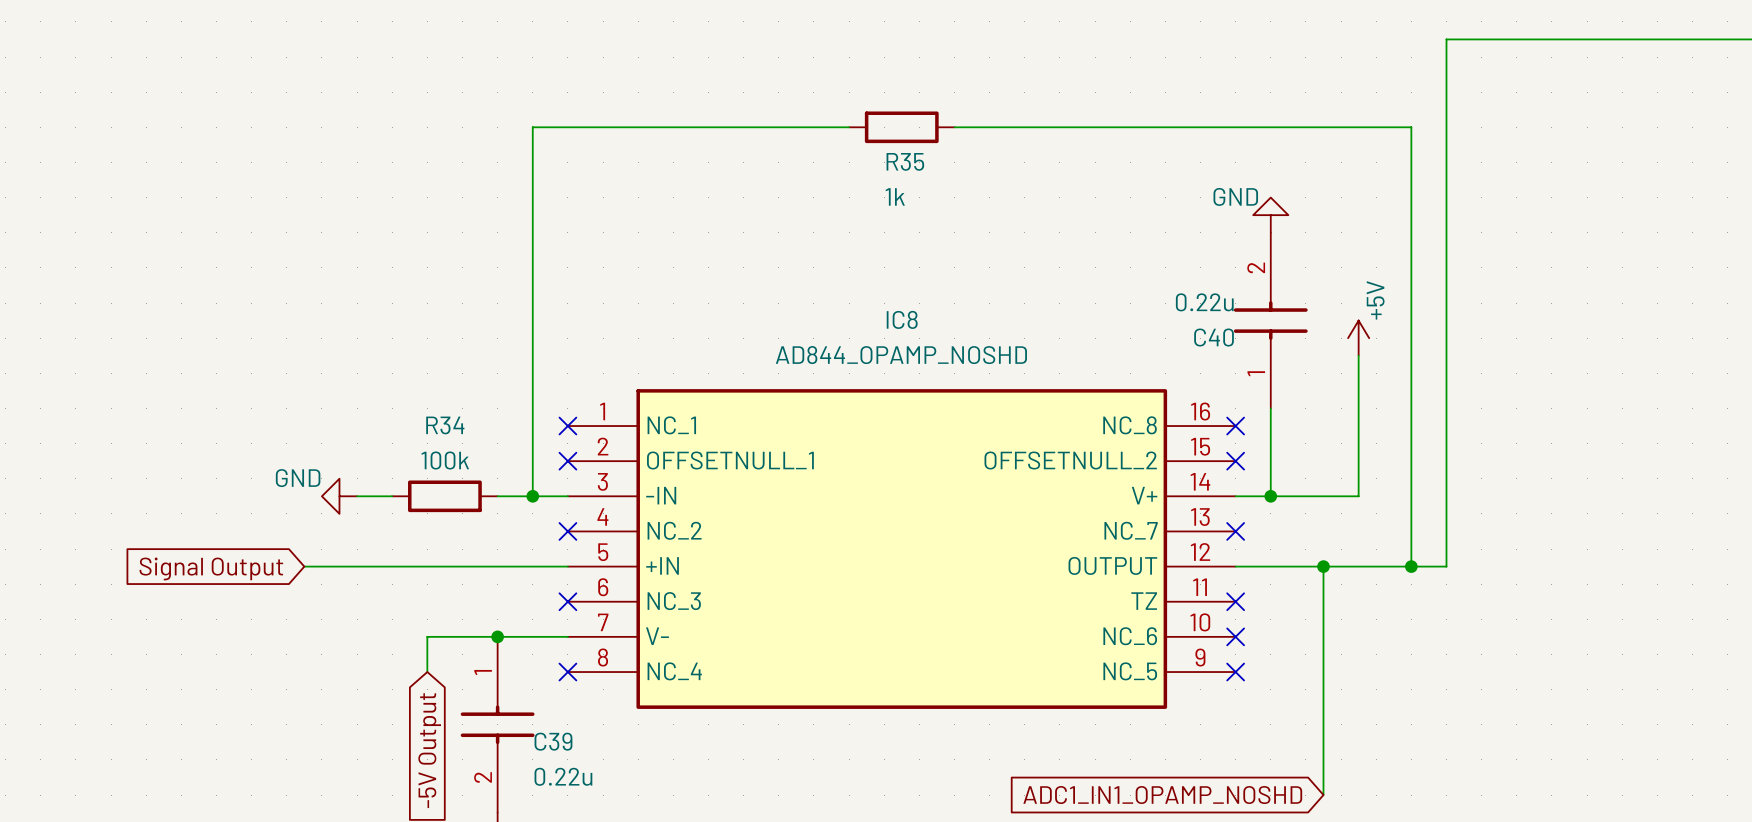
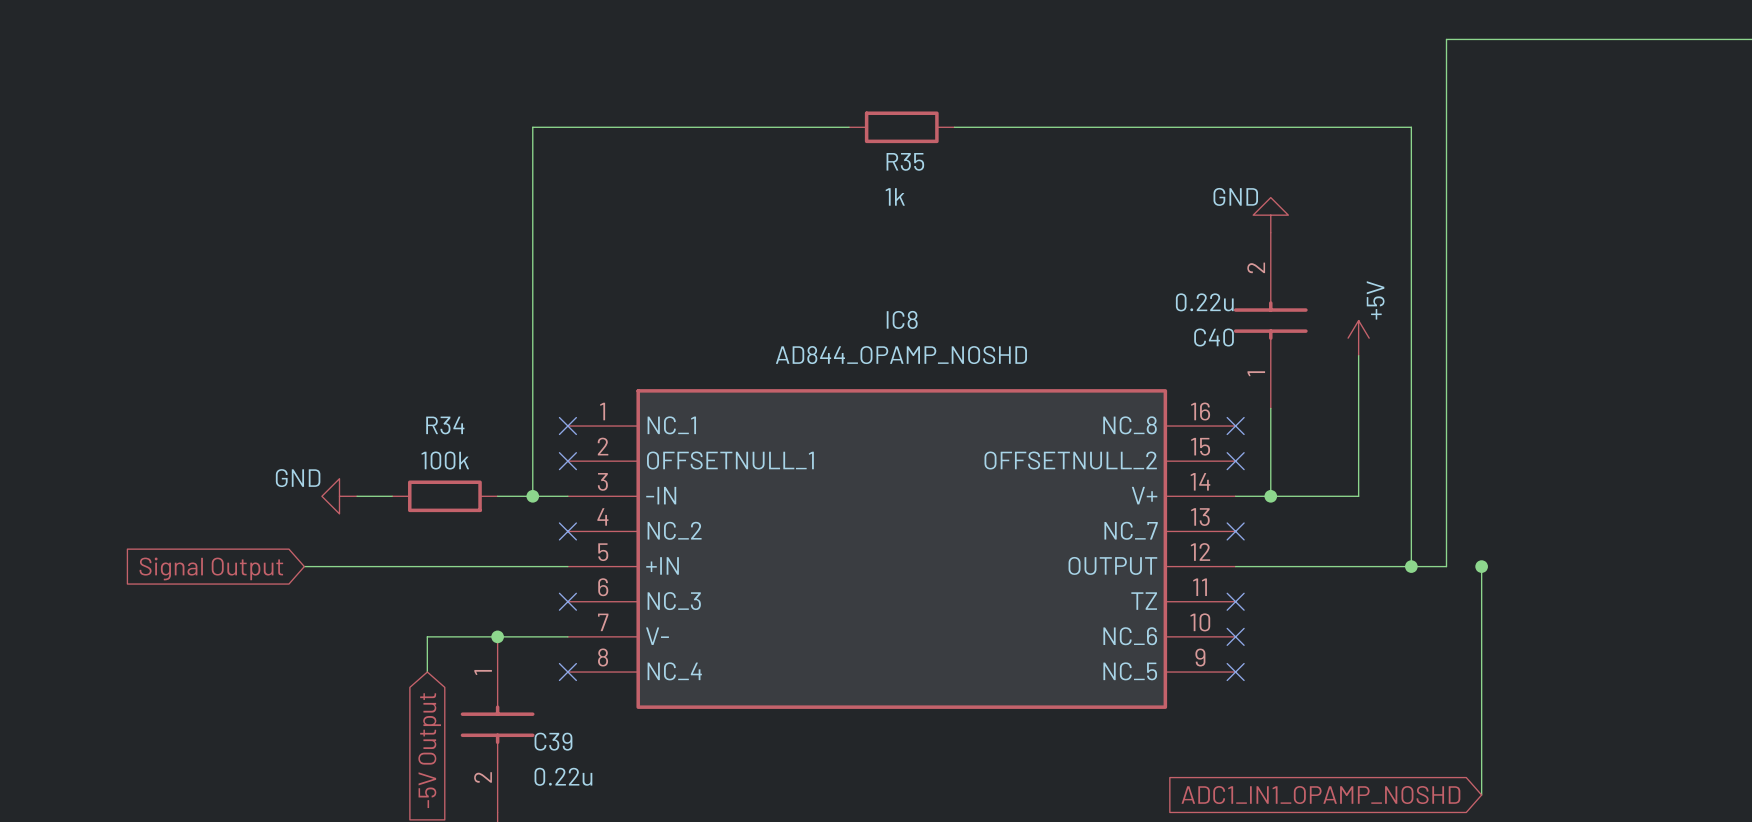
wire: (1323, 566) (1323, 795) -> (1481, 566) (1481, 795)
junction: (1323, 566) -> none
junction: none -> (1481, 566)
global label position: ADC1_IN1_OPAMP_NOSHD (1162, 795) -> ADC1_IN1_OPAMP_NOSHD (1320, 795)

